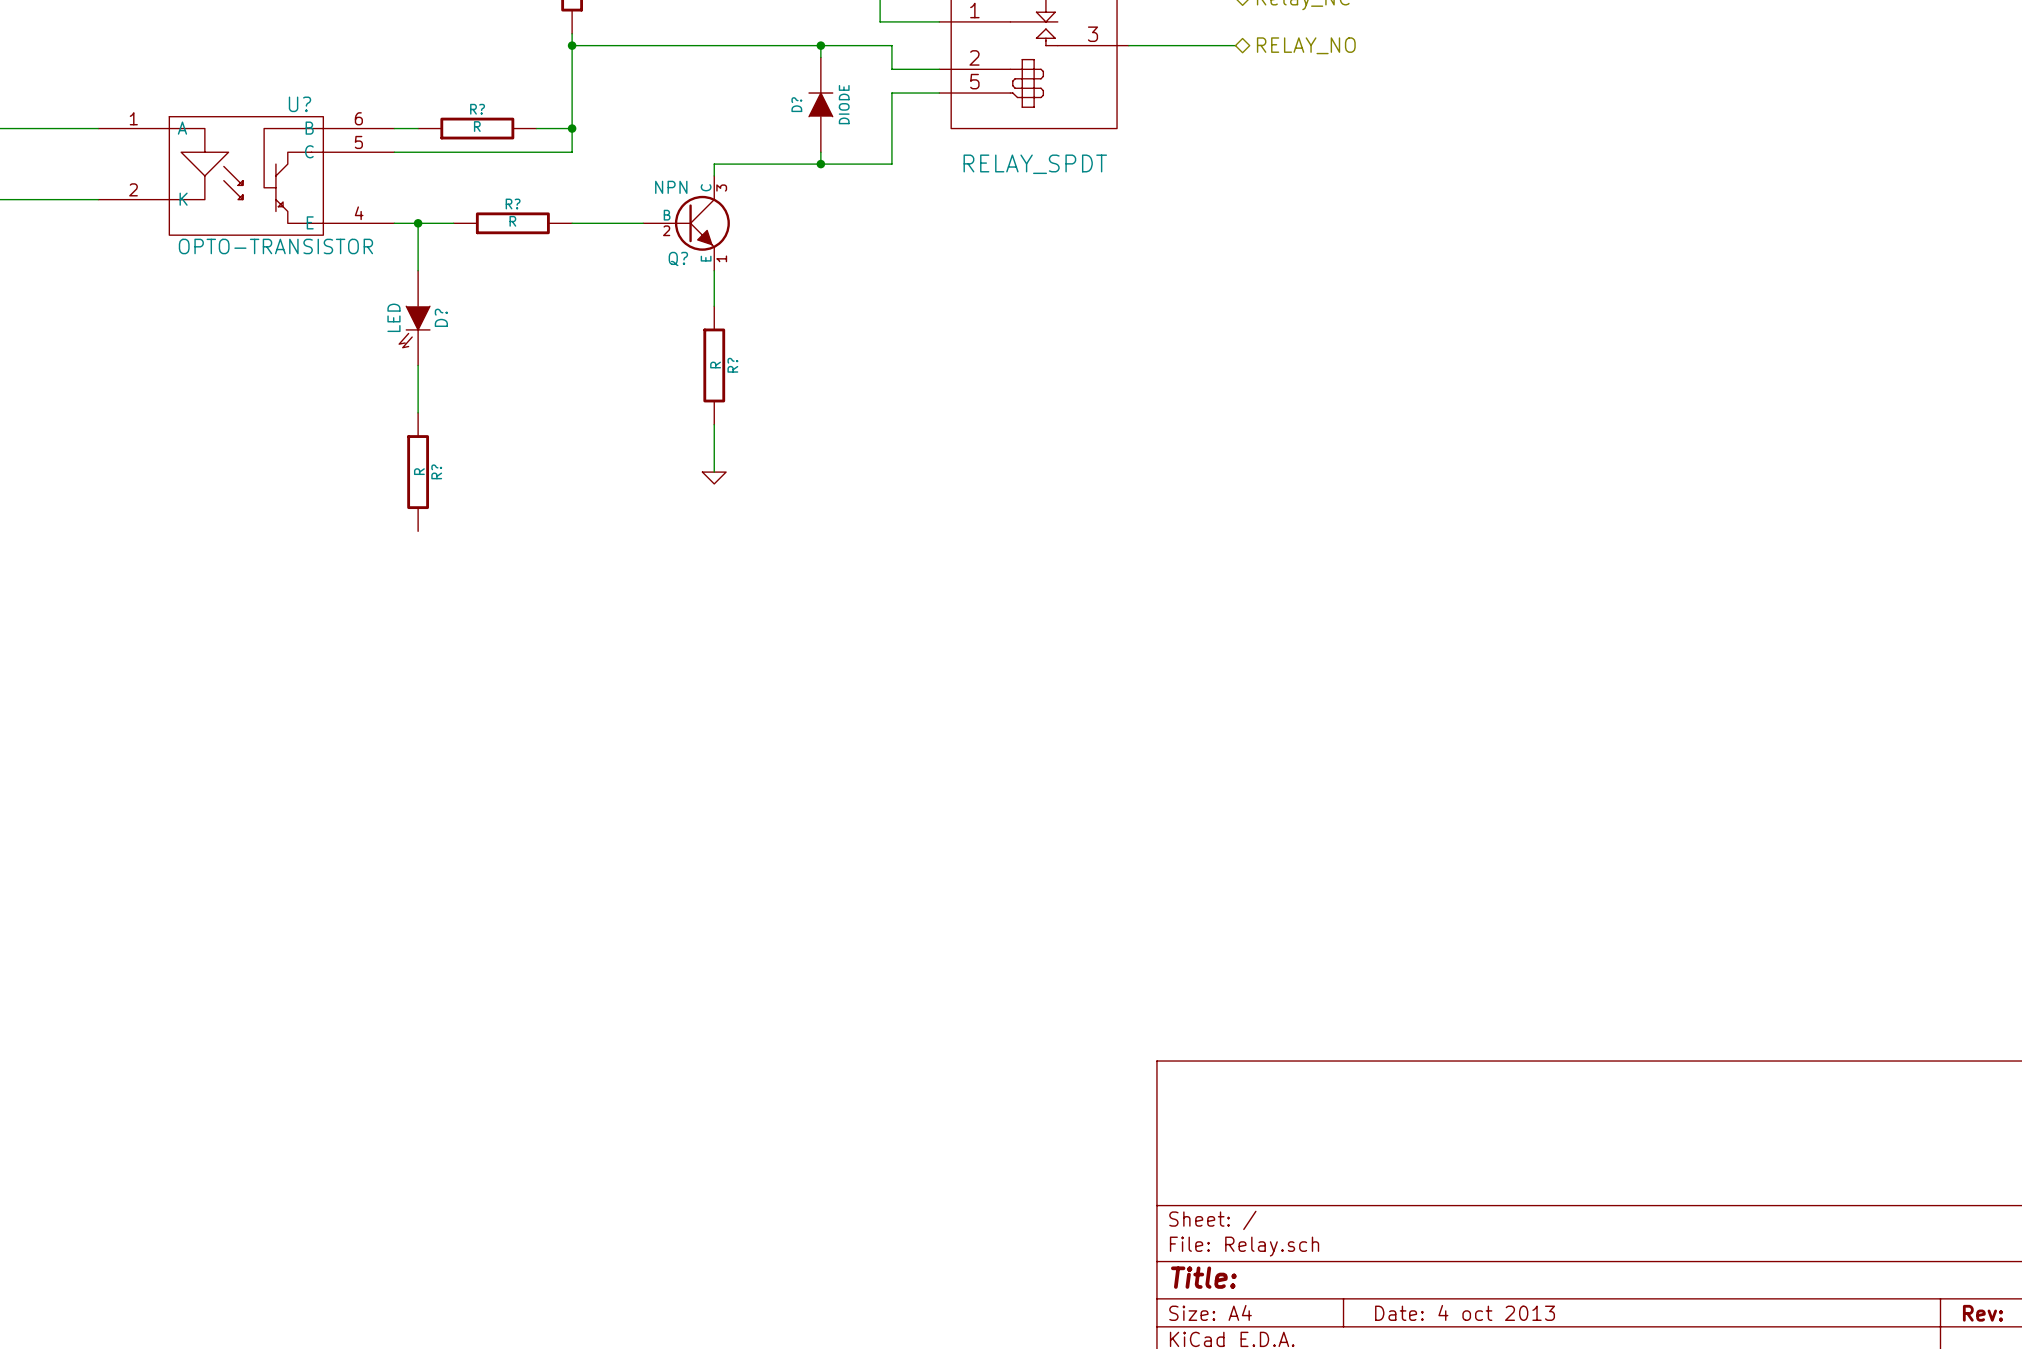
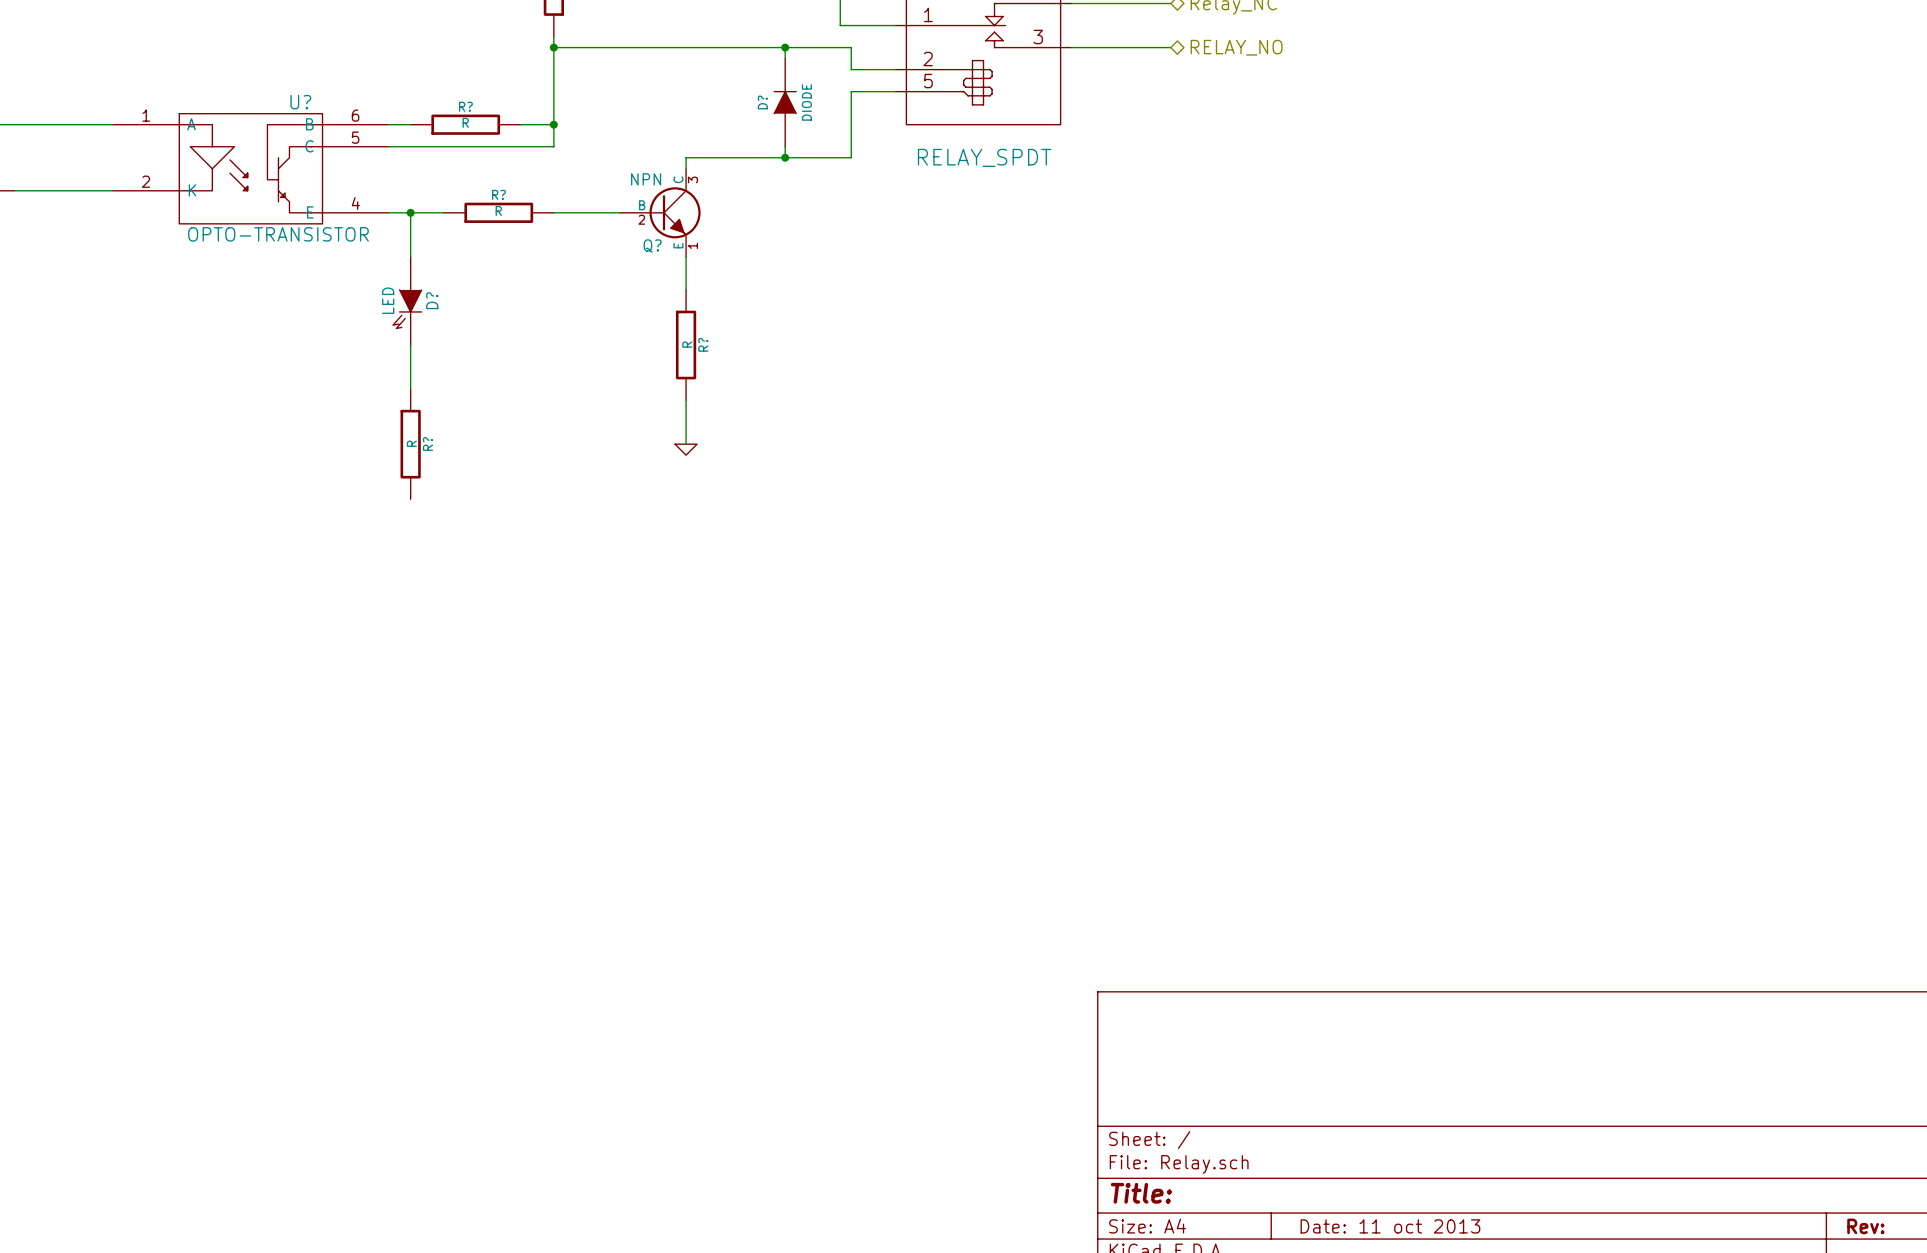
title block: Date: 4 oct 2013 (1465, 1312) -> Date: 11 oct 2013 (1390, 1226)

